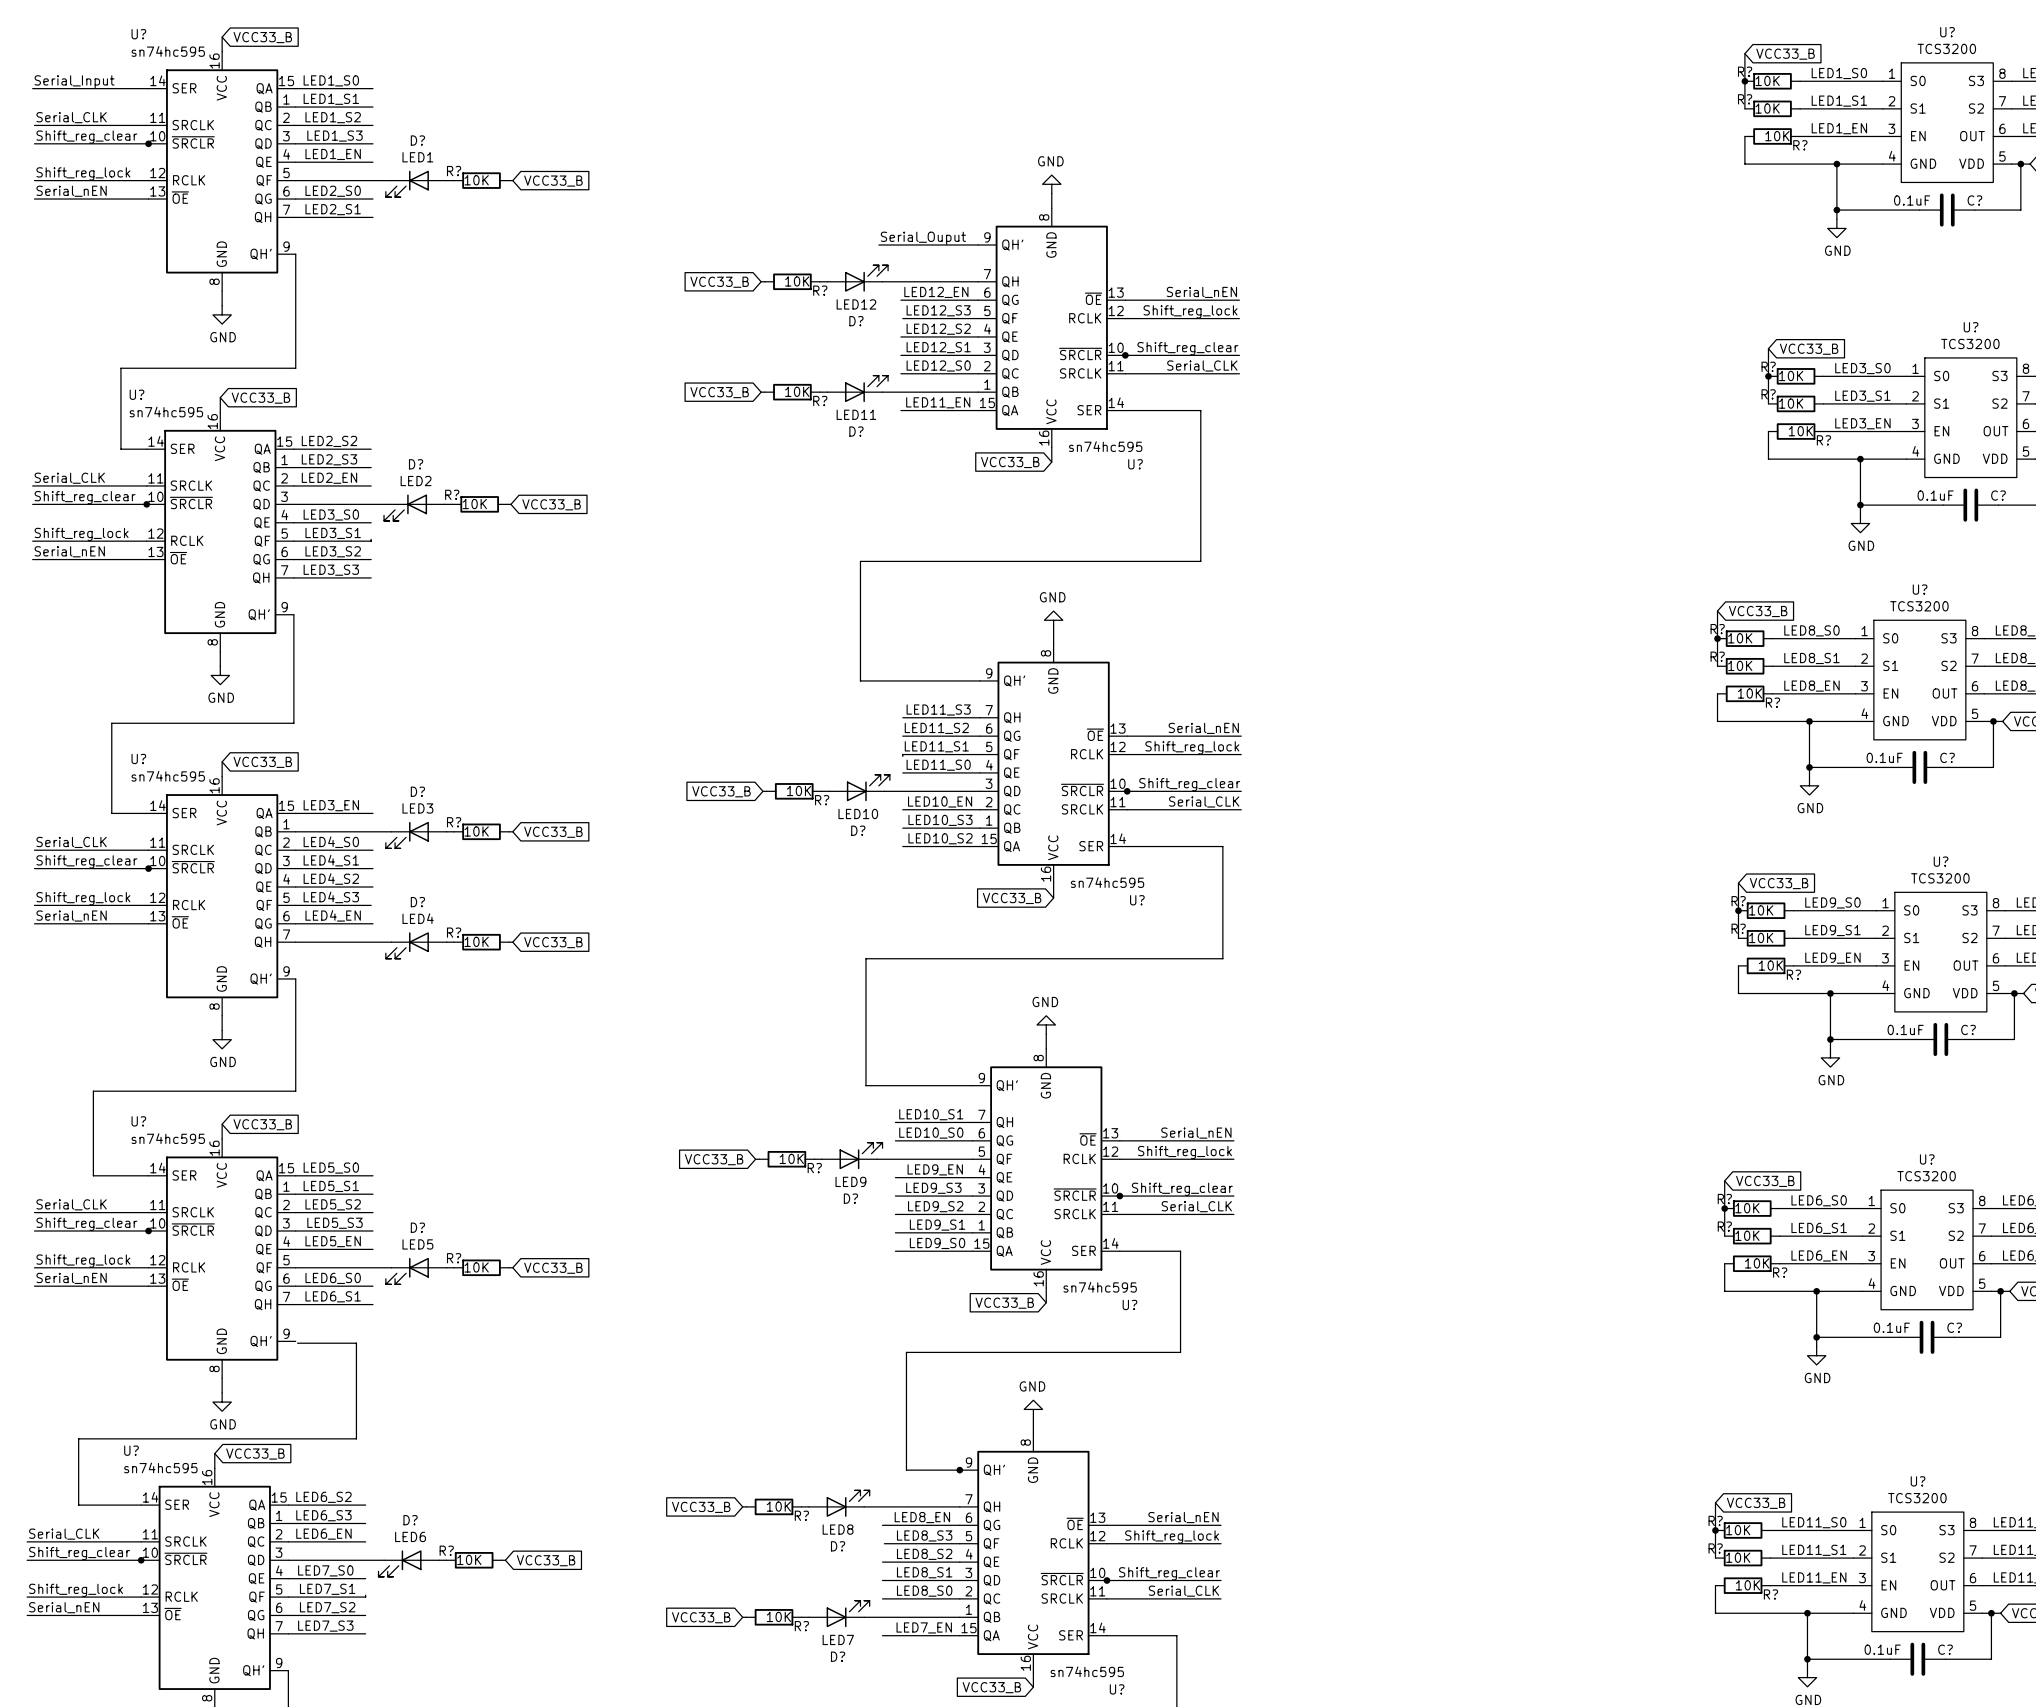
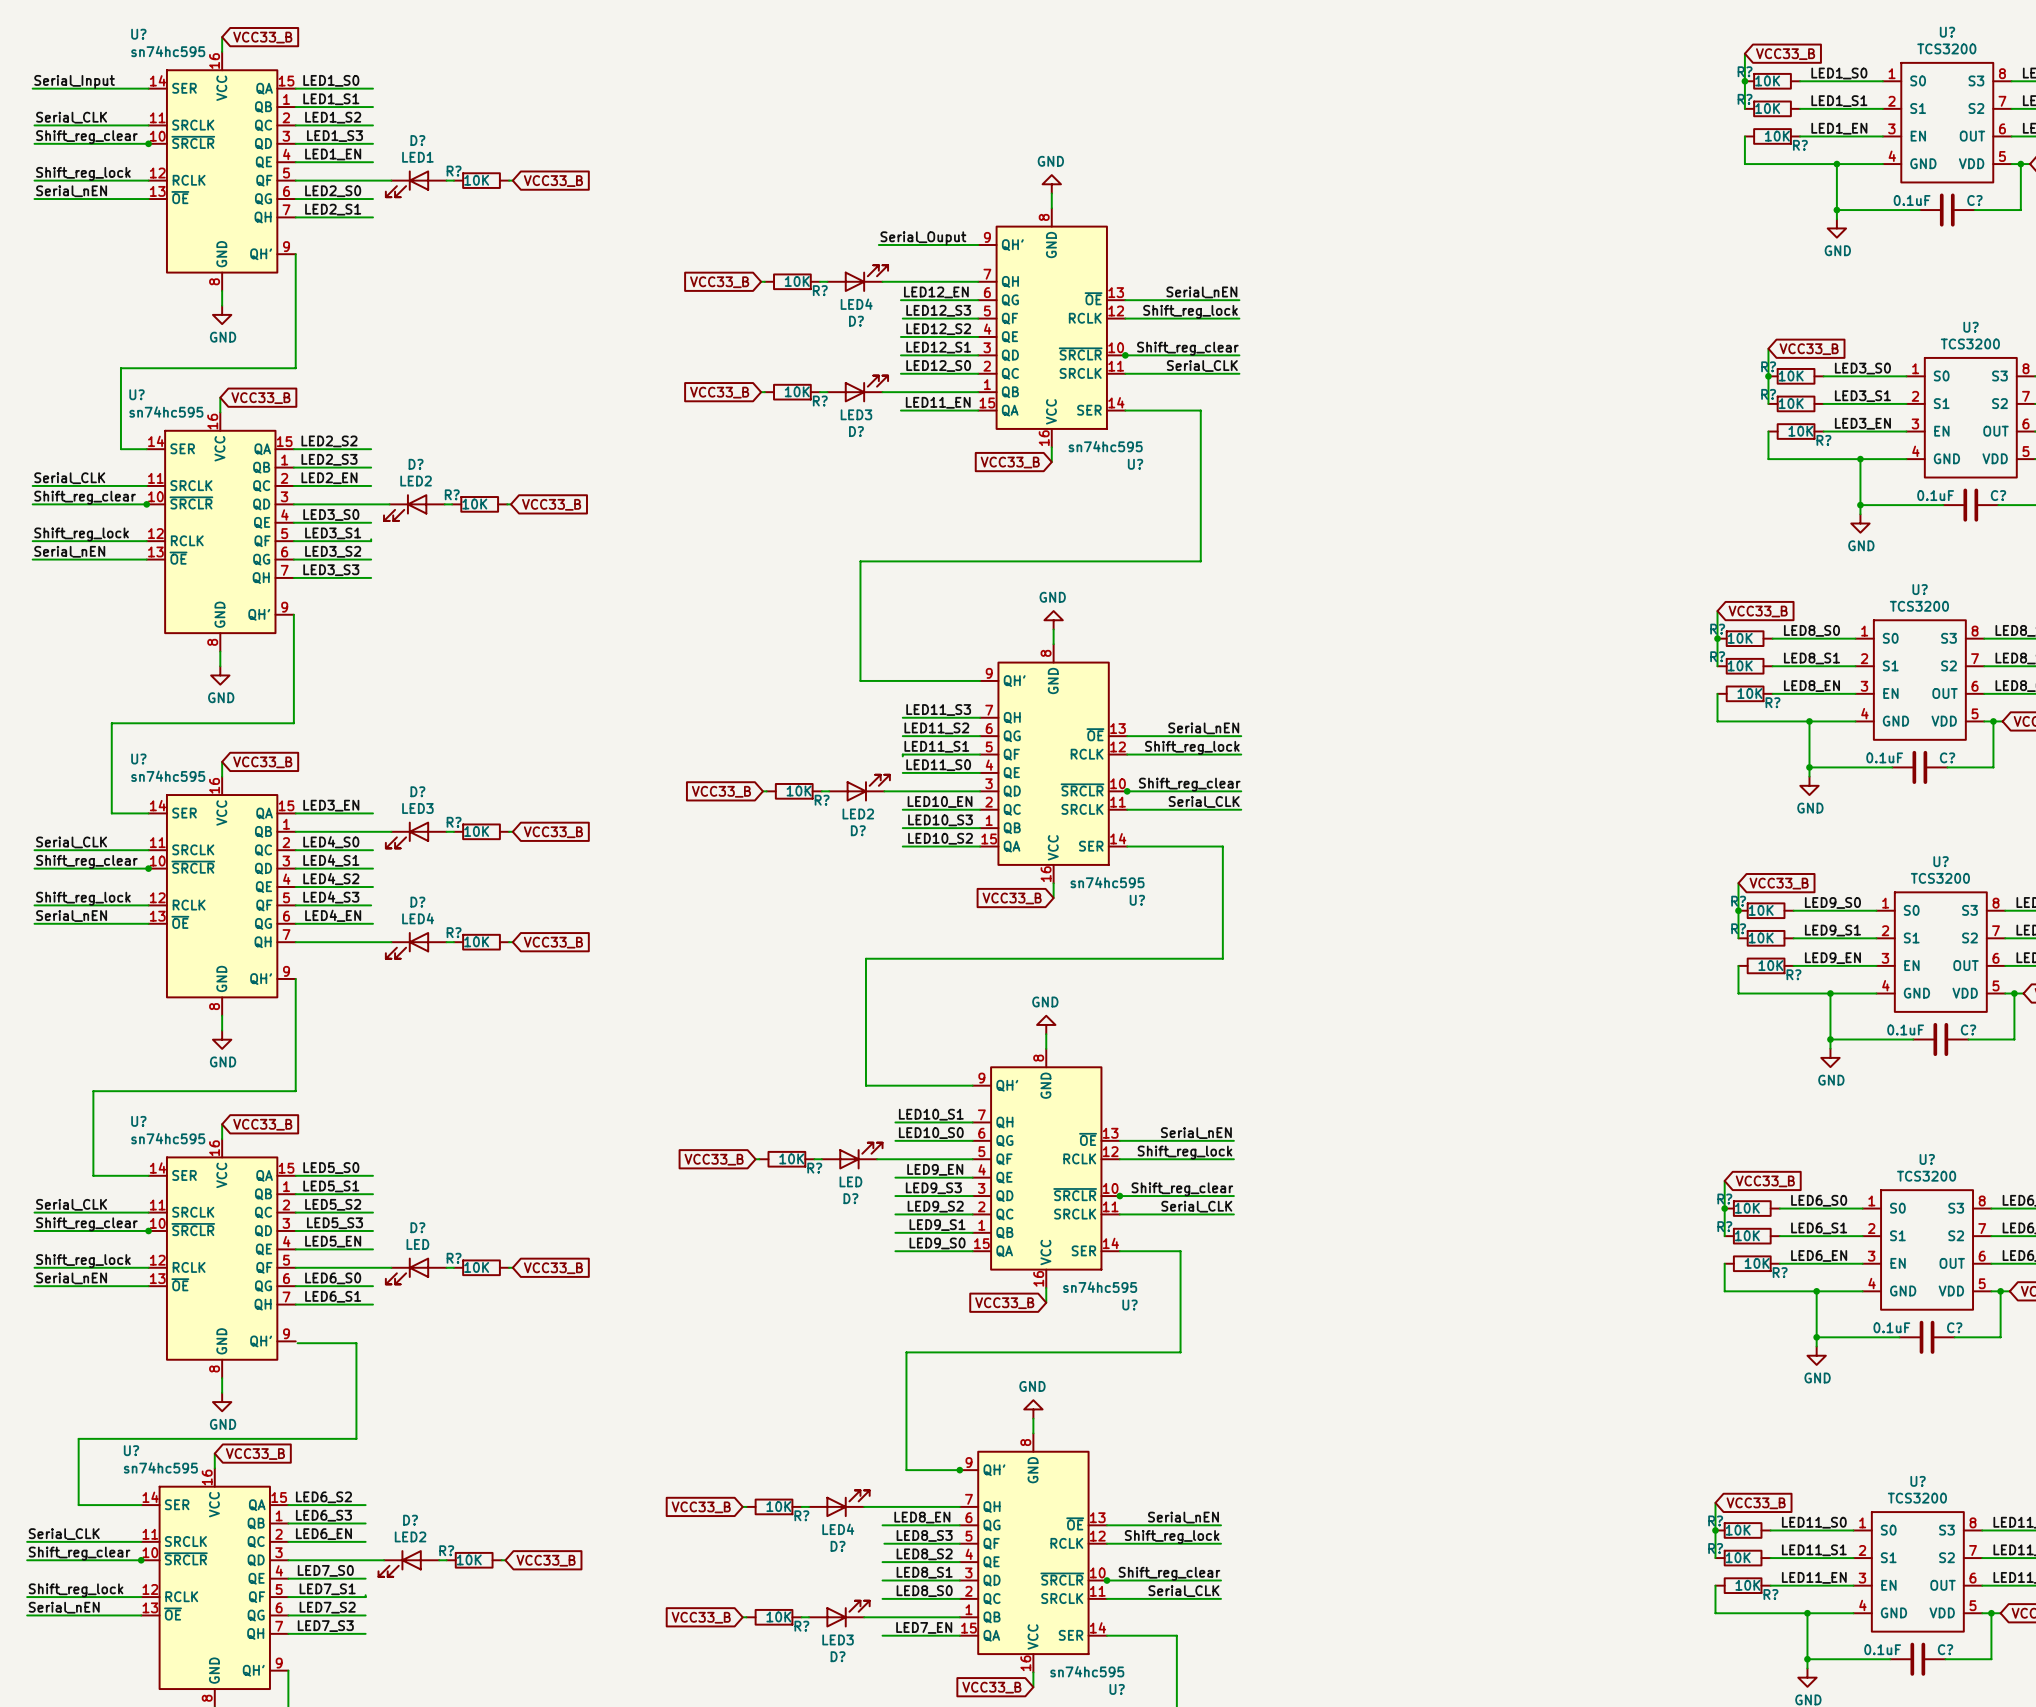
D? value: LED12 (856, 304) -> LED4 (856, 304)
D? value: LED11 (856, 414) -> LED3 (856, 414)
D? value: LED10 (858, 813) -> LED2 (858, 813)
D? value: LED9 (850, 1181) -> LED (850, 1181)
D? value: LED5 (417, 1244) -> LED (417, 1244)
D? value: LED8 (838, 1529) -> LED4 (838, 1529)
D? value: LED6 (410, 1536) -> LED2 (410, 1536)
D? value: LED7 (838, 1639) -> LED3 (838, 1639)

